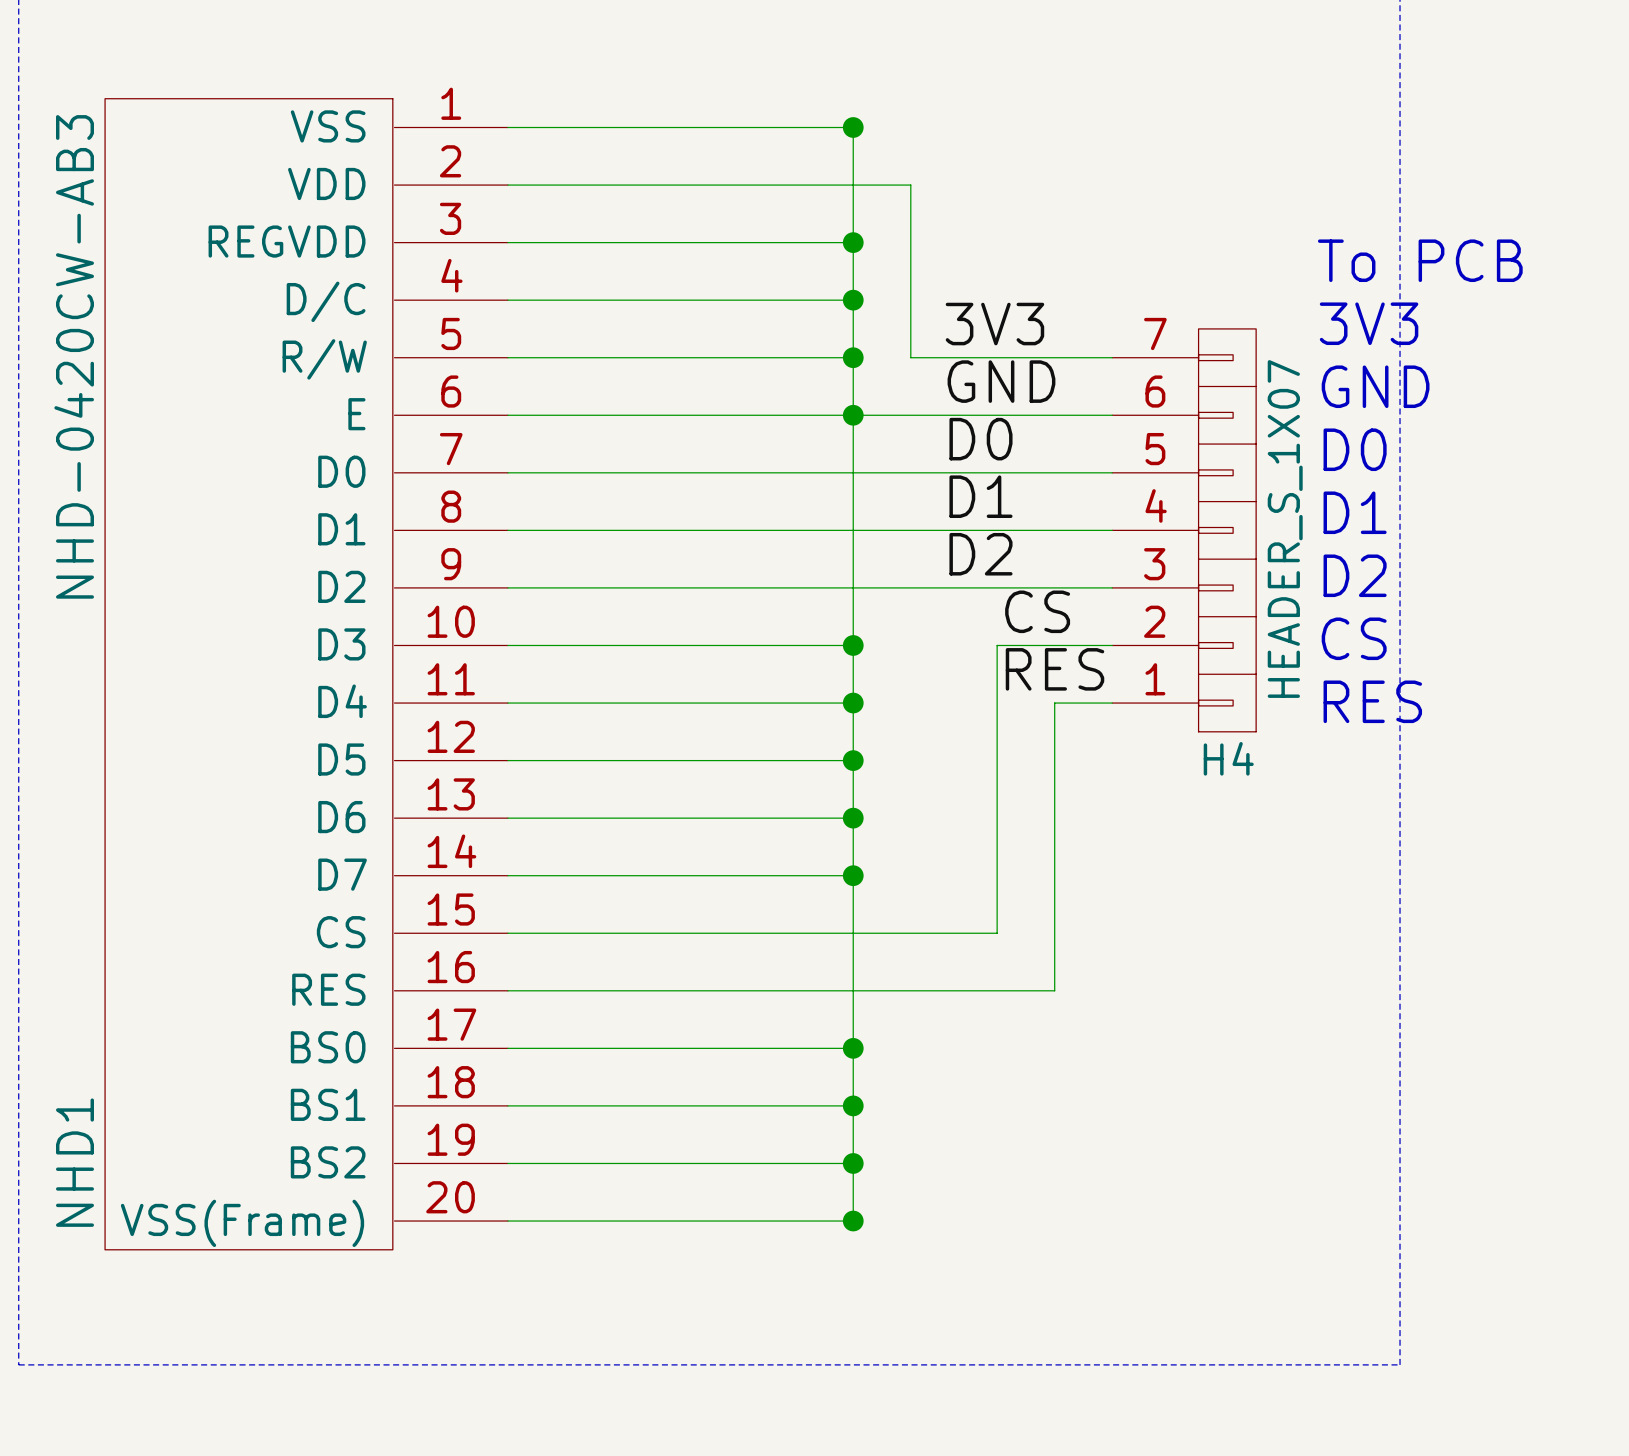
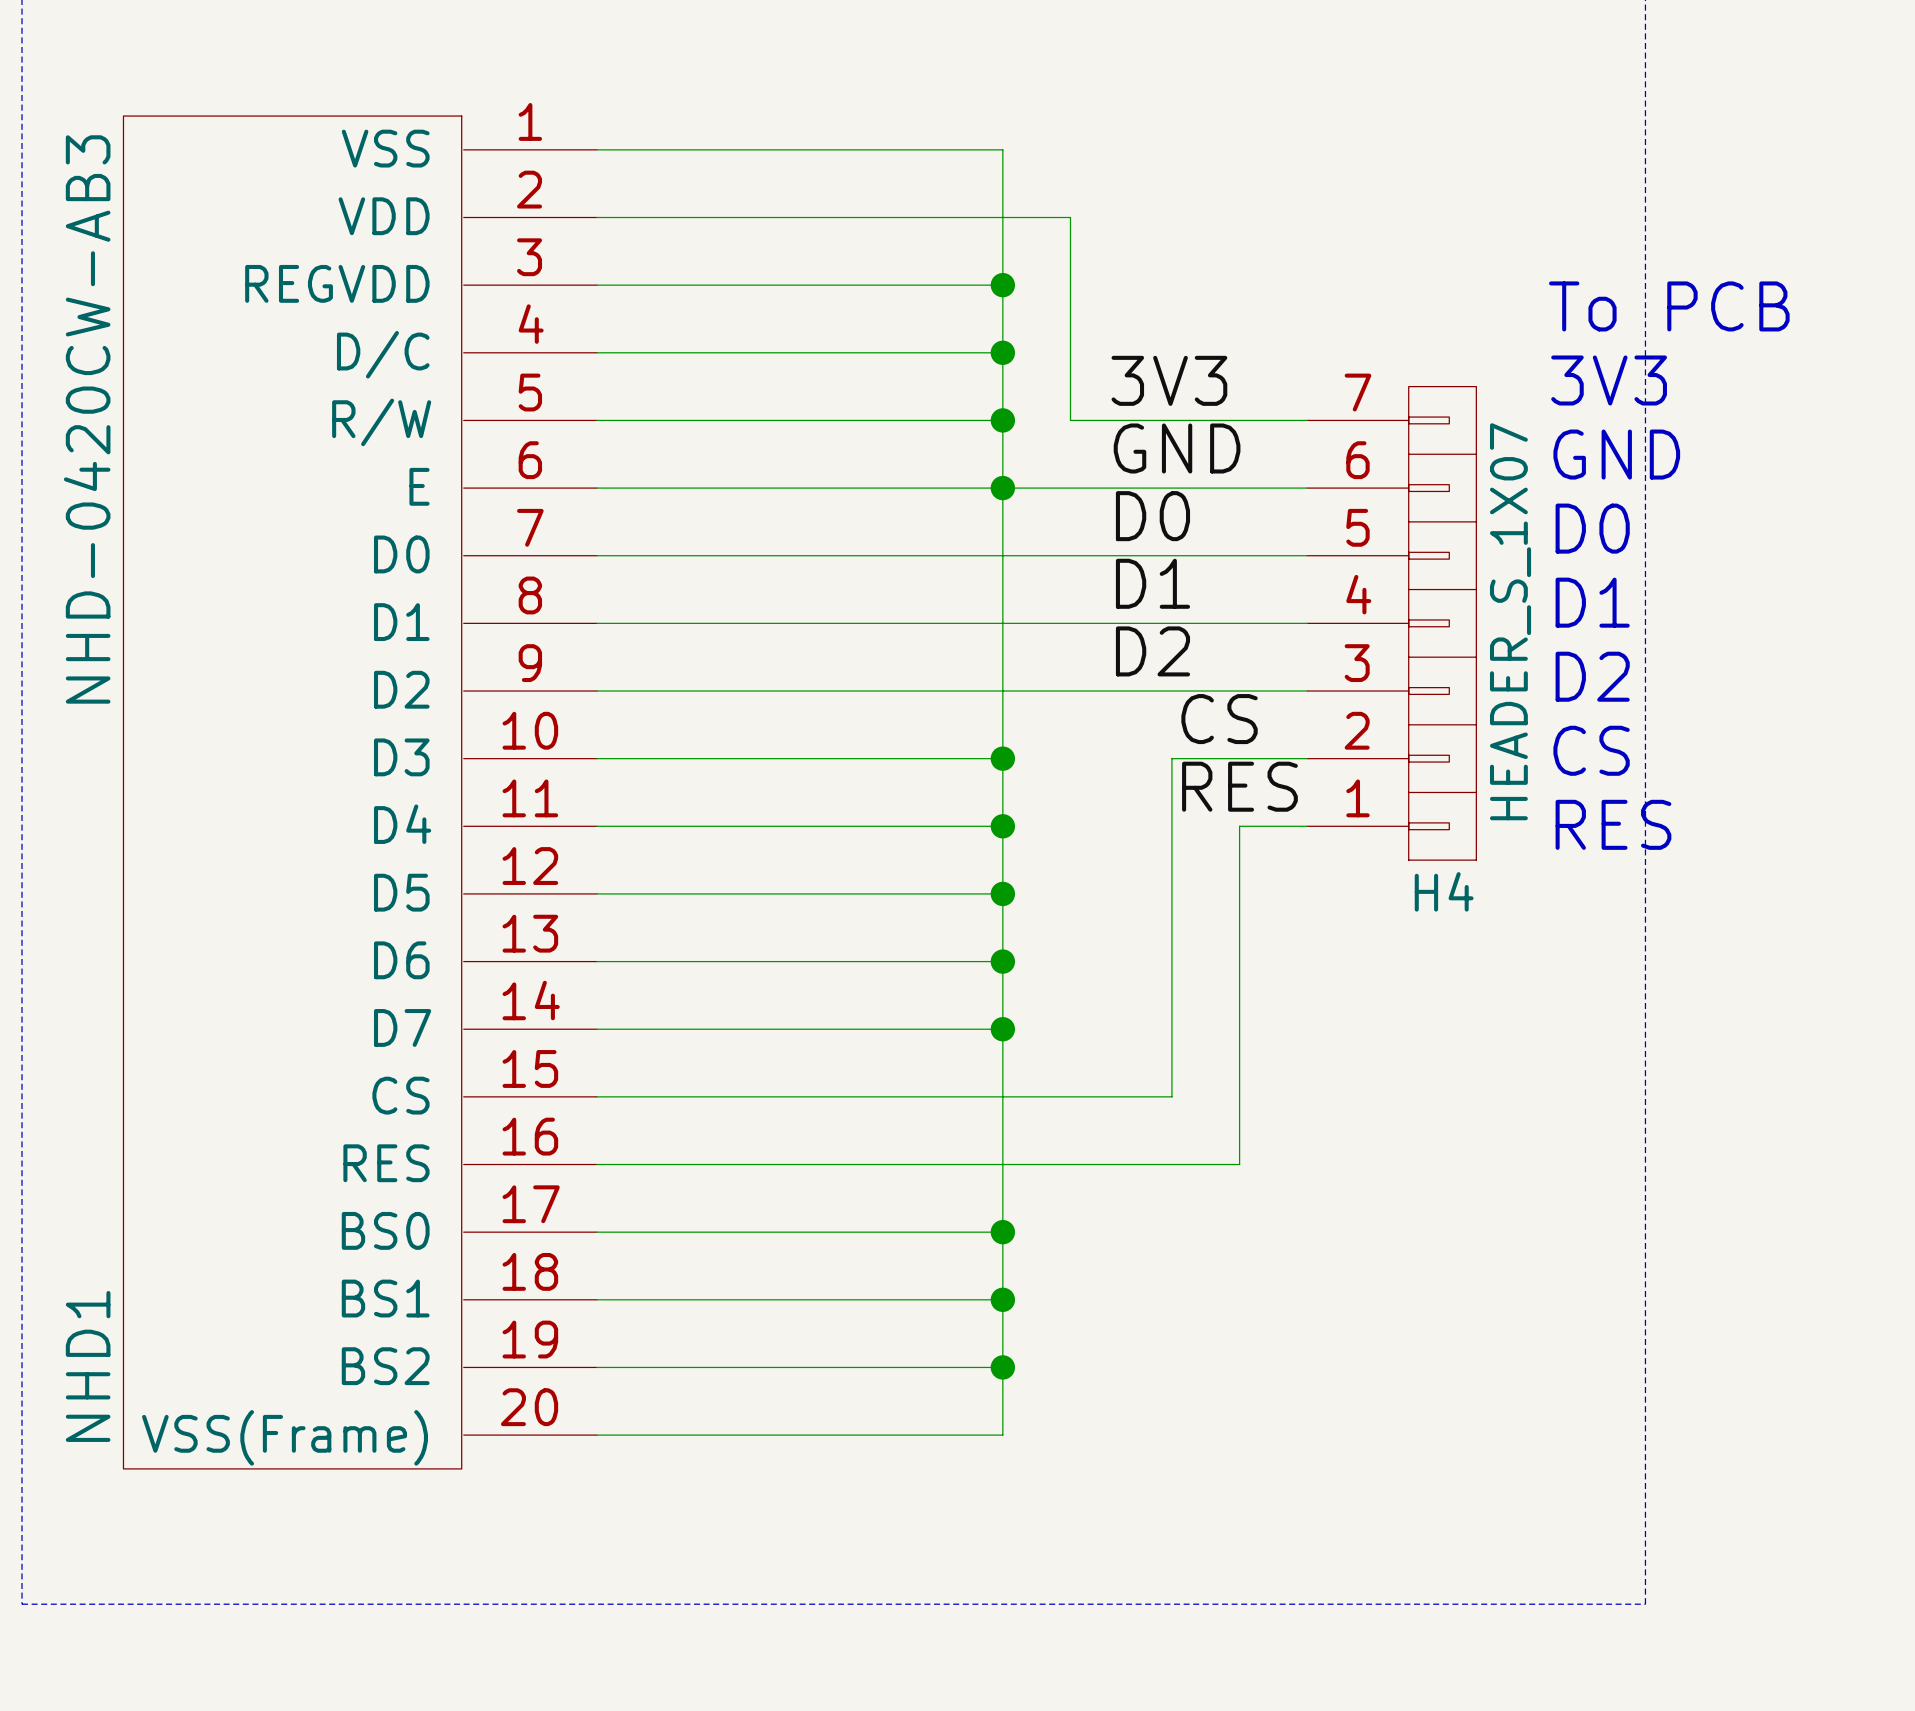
junction: (853, 127) -> none
junction: (853, 1221) -> none

